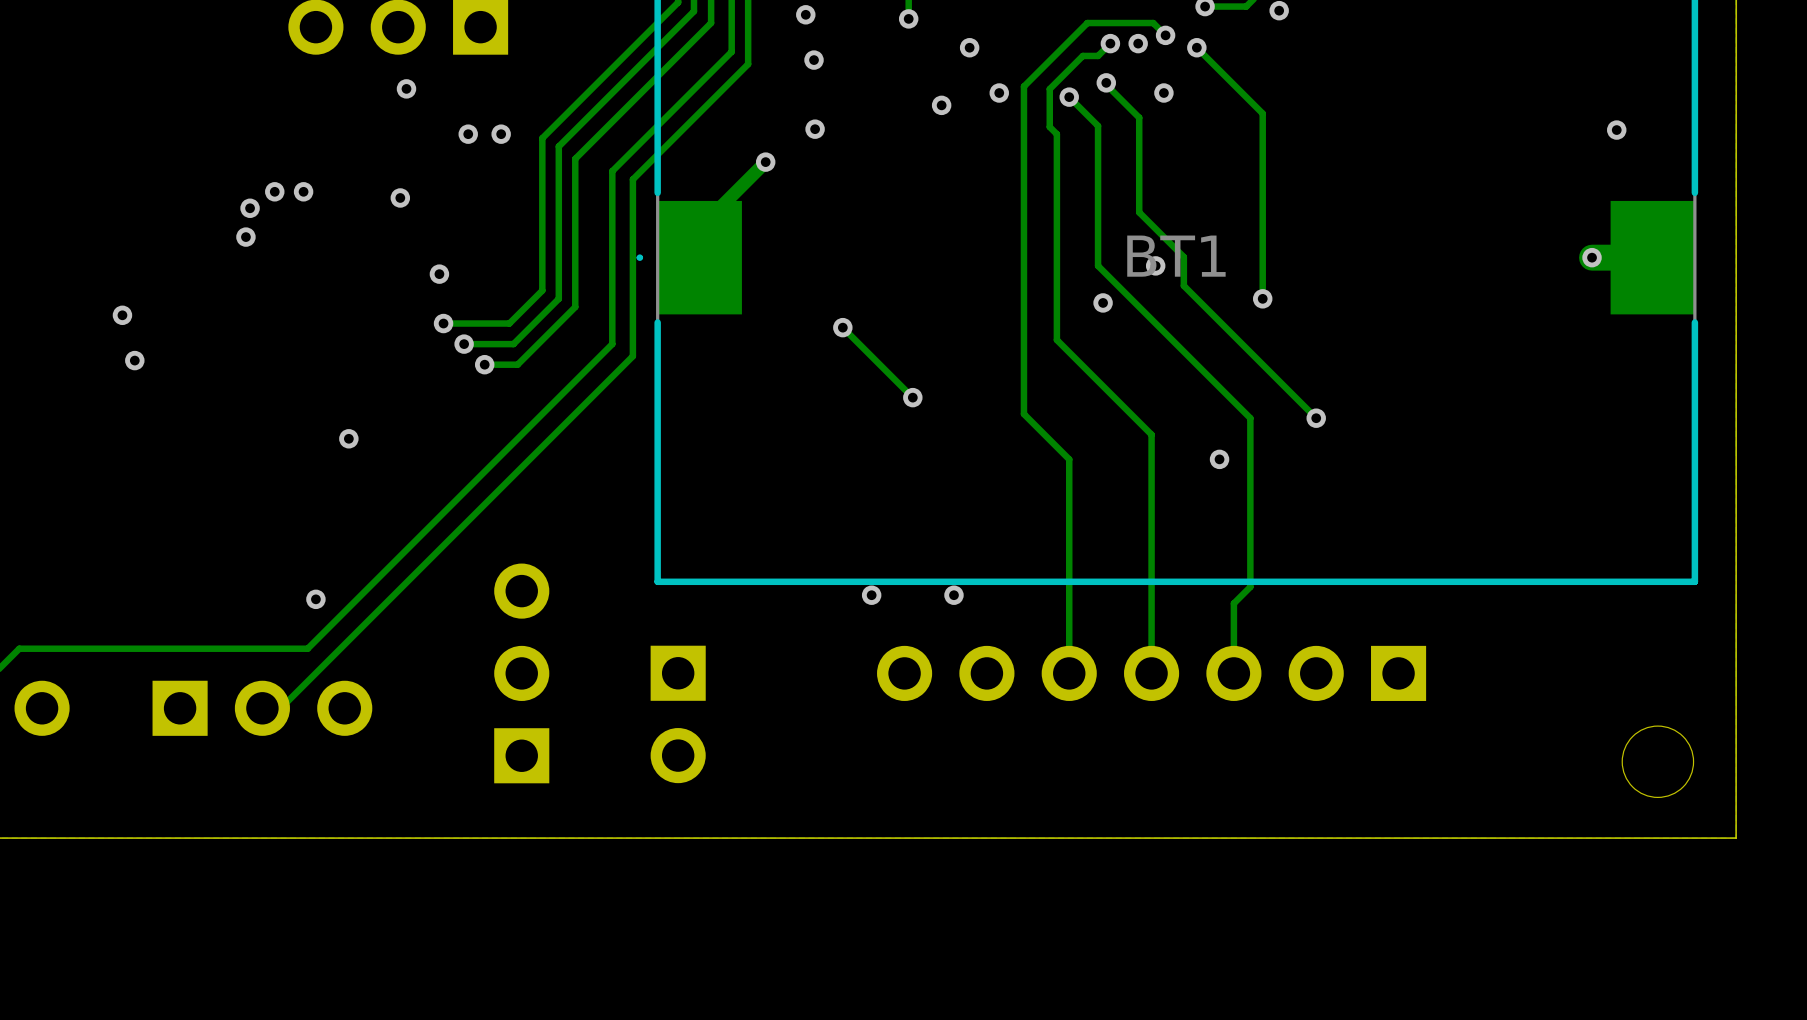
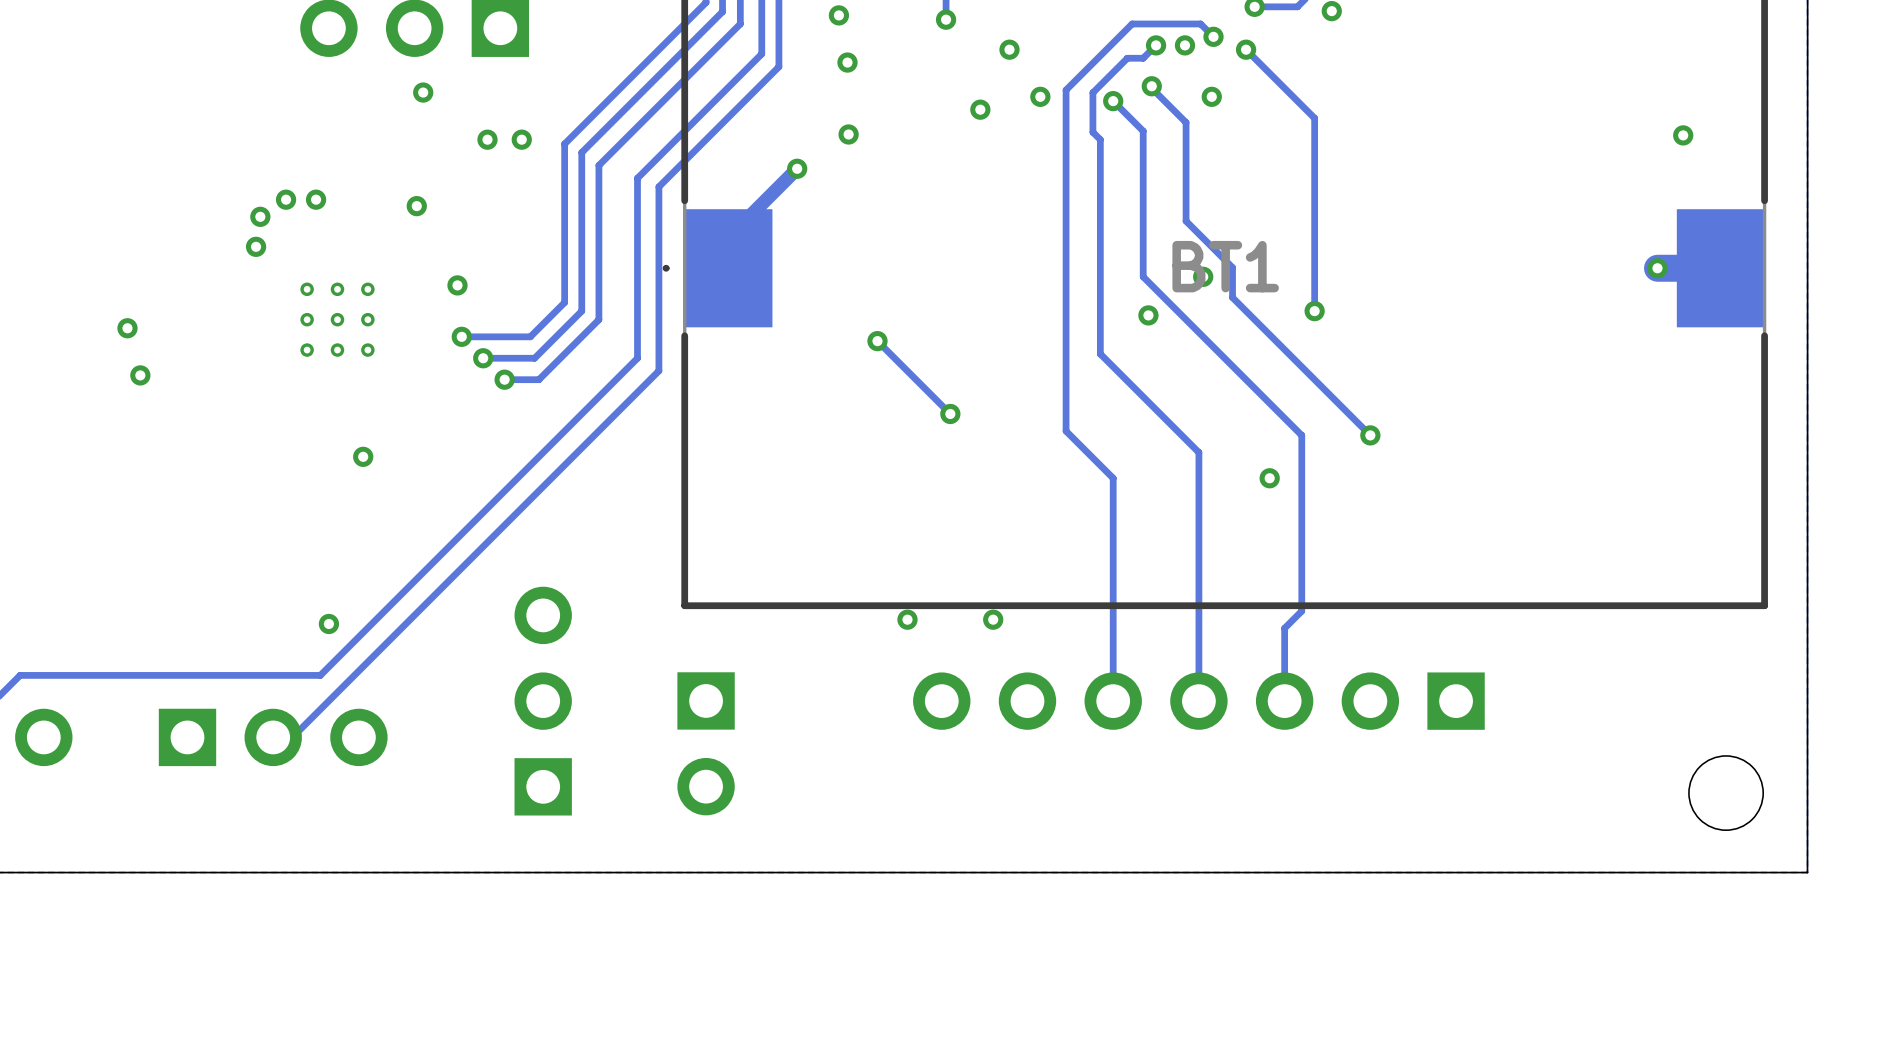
via: none -> (307, 289)
via: none -> (337, 289)
via: none -> (367, 289)
via: none -> (307, 319)
via: none -> (337, 319)
via: none -> (367, 319)
via: none -> (307, 350)
via: none -> (337, 350)
via: none -> (367, 350)

